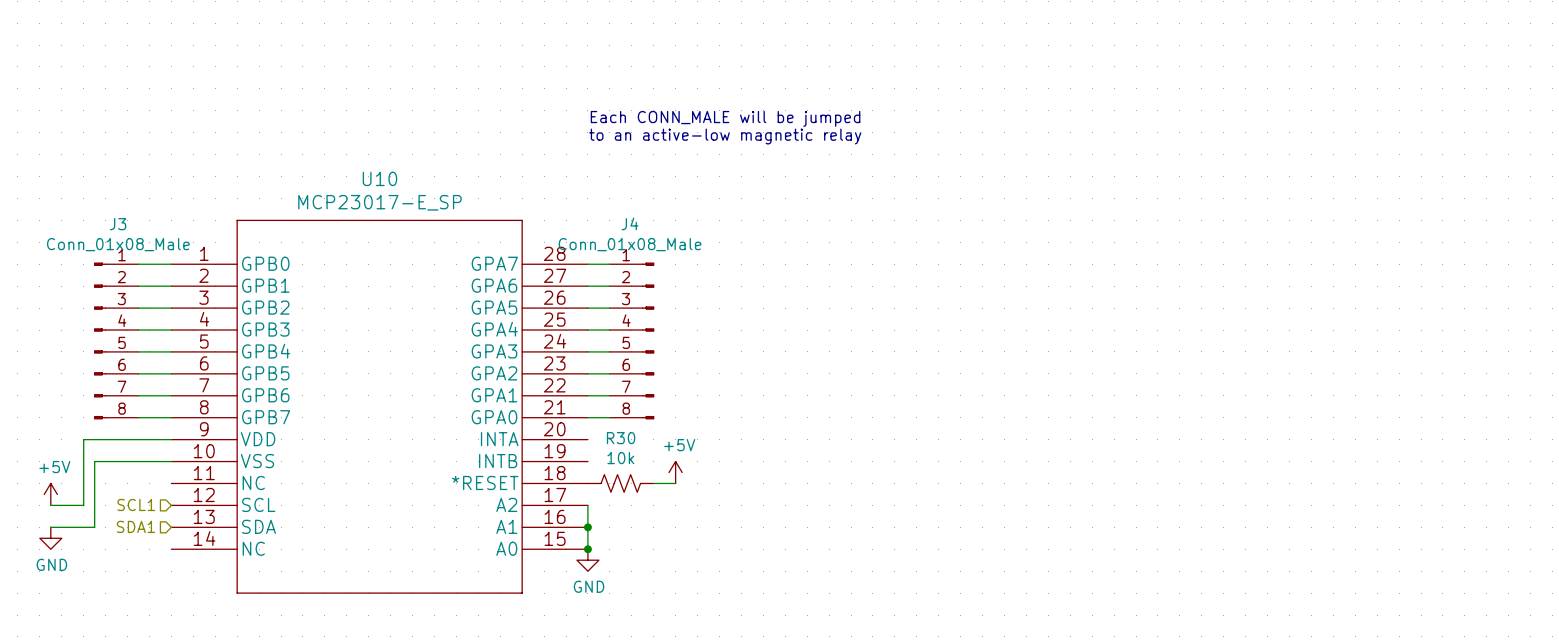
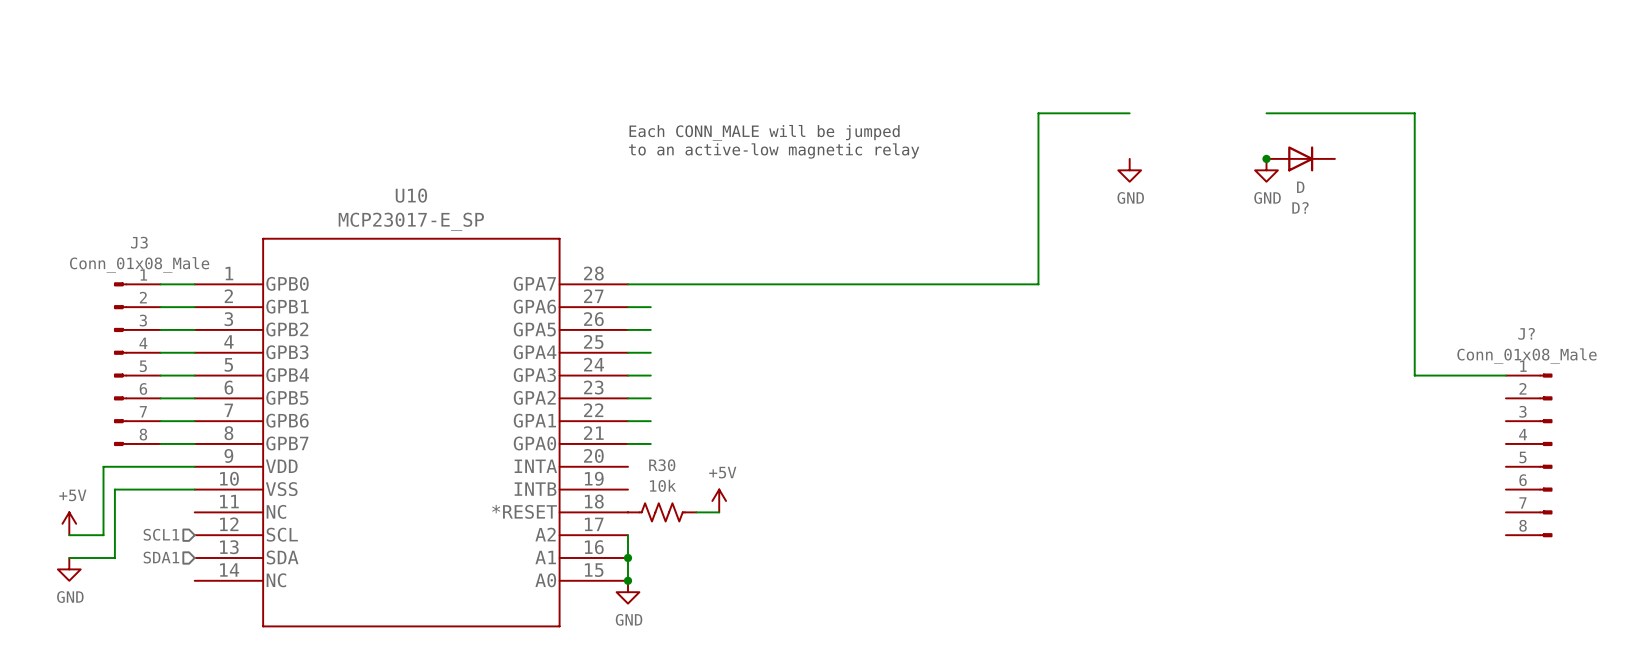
wire: none -> (1129, 113) (1038, 113) (1038, 284) (650, 284)
wire: none -> (1266, 113) (1414, 113) (1414, 375) (1505, 375)
junction: none -> (1266, 158)
D?: none -> D (1300, 158)
power symbol: none -> GND (1129, 170)
power symbol: none -> GND (1266, 170)
J4: Conn_01x08_Male (632, 340) -> none
J?: none -> Conn_01x08_Male (1529, 455)

